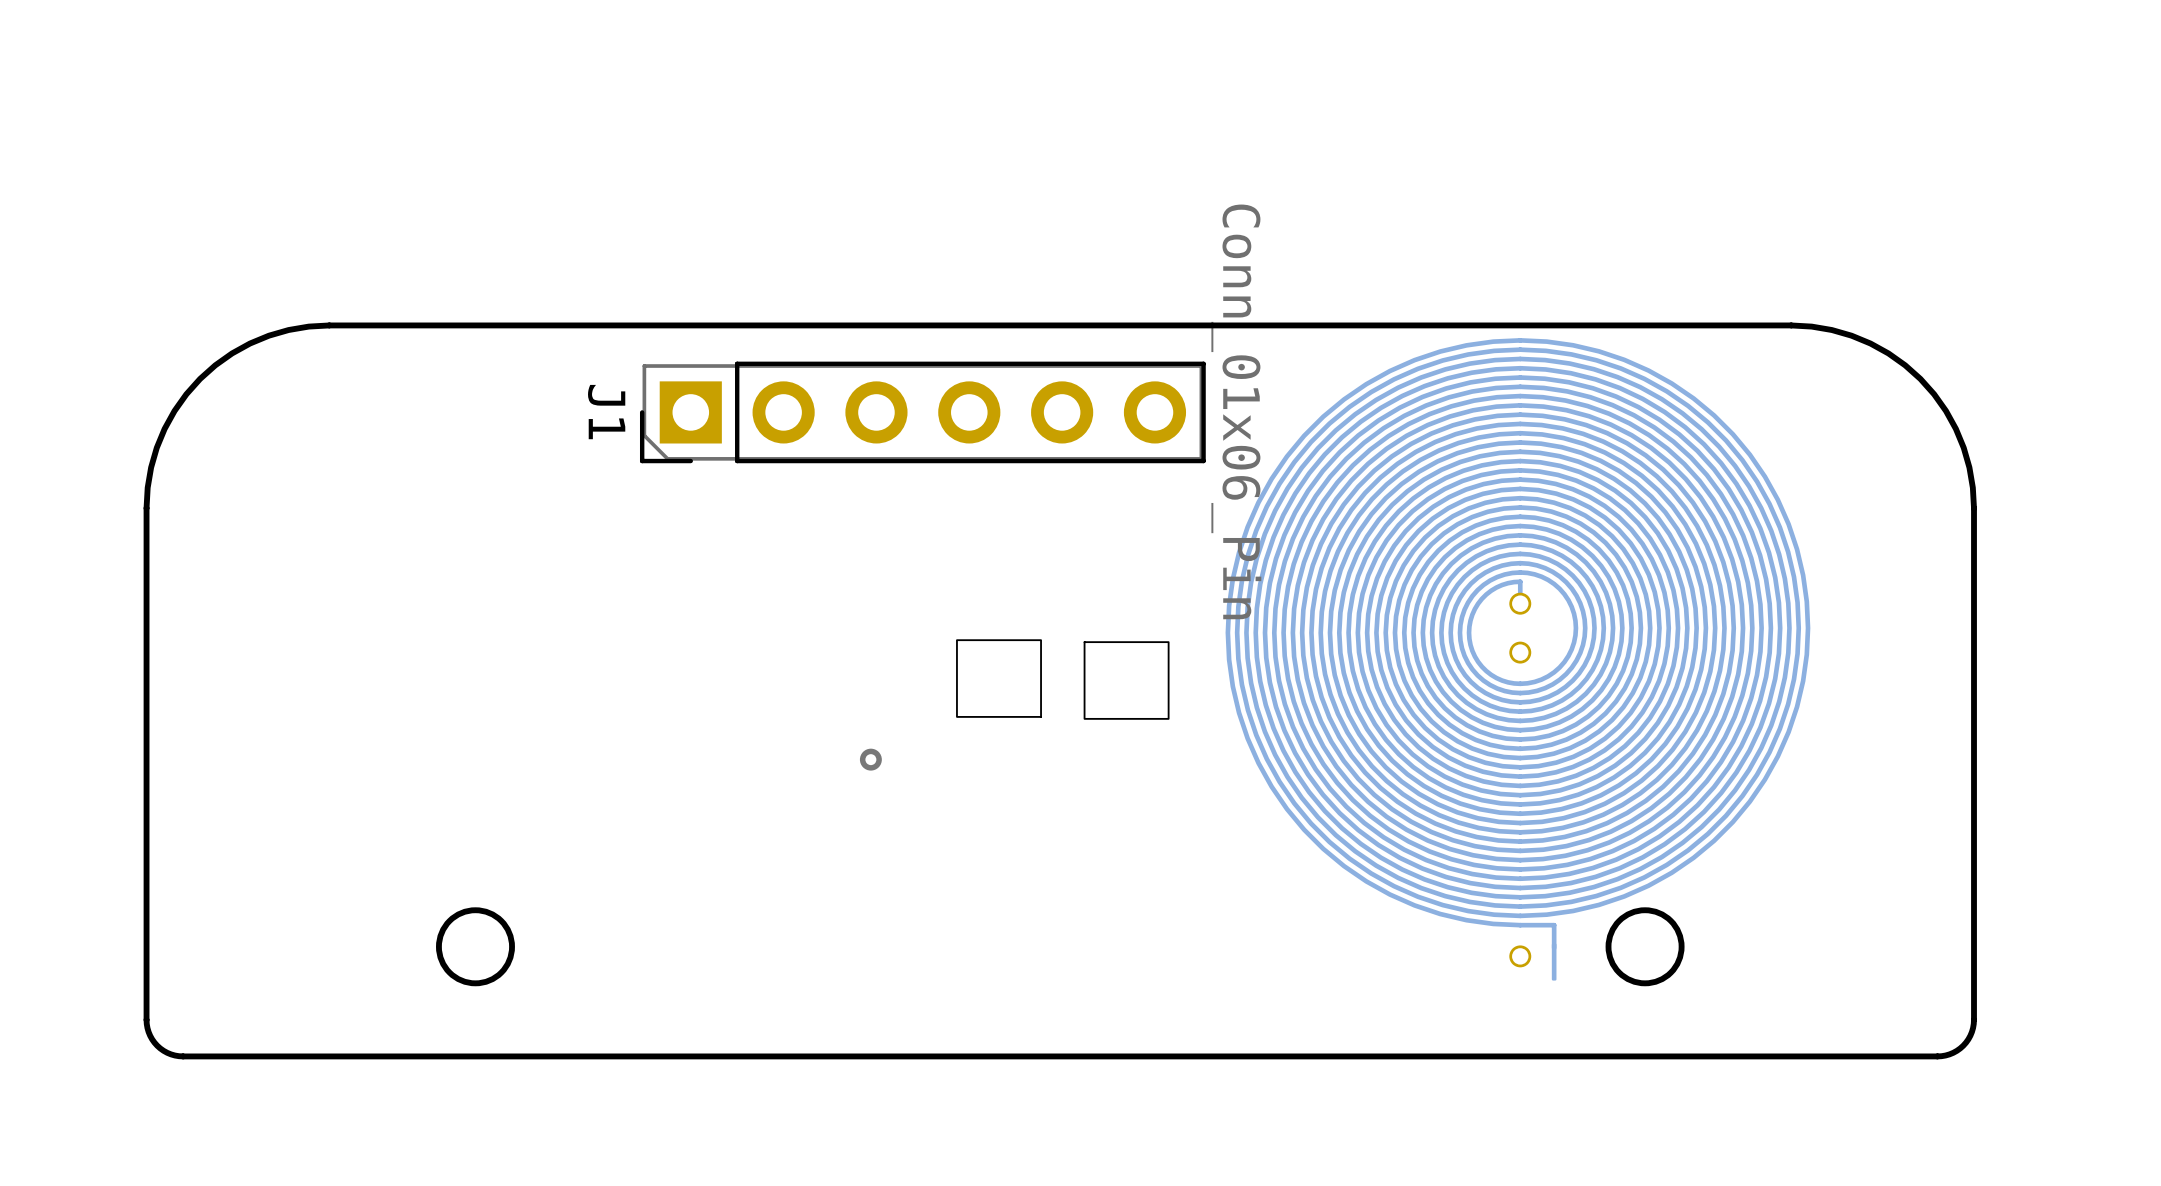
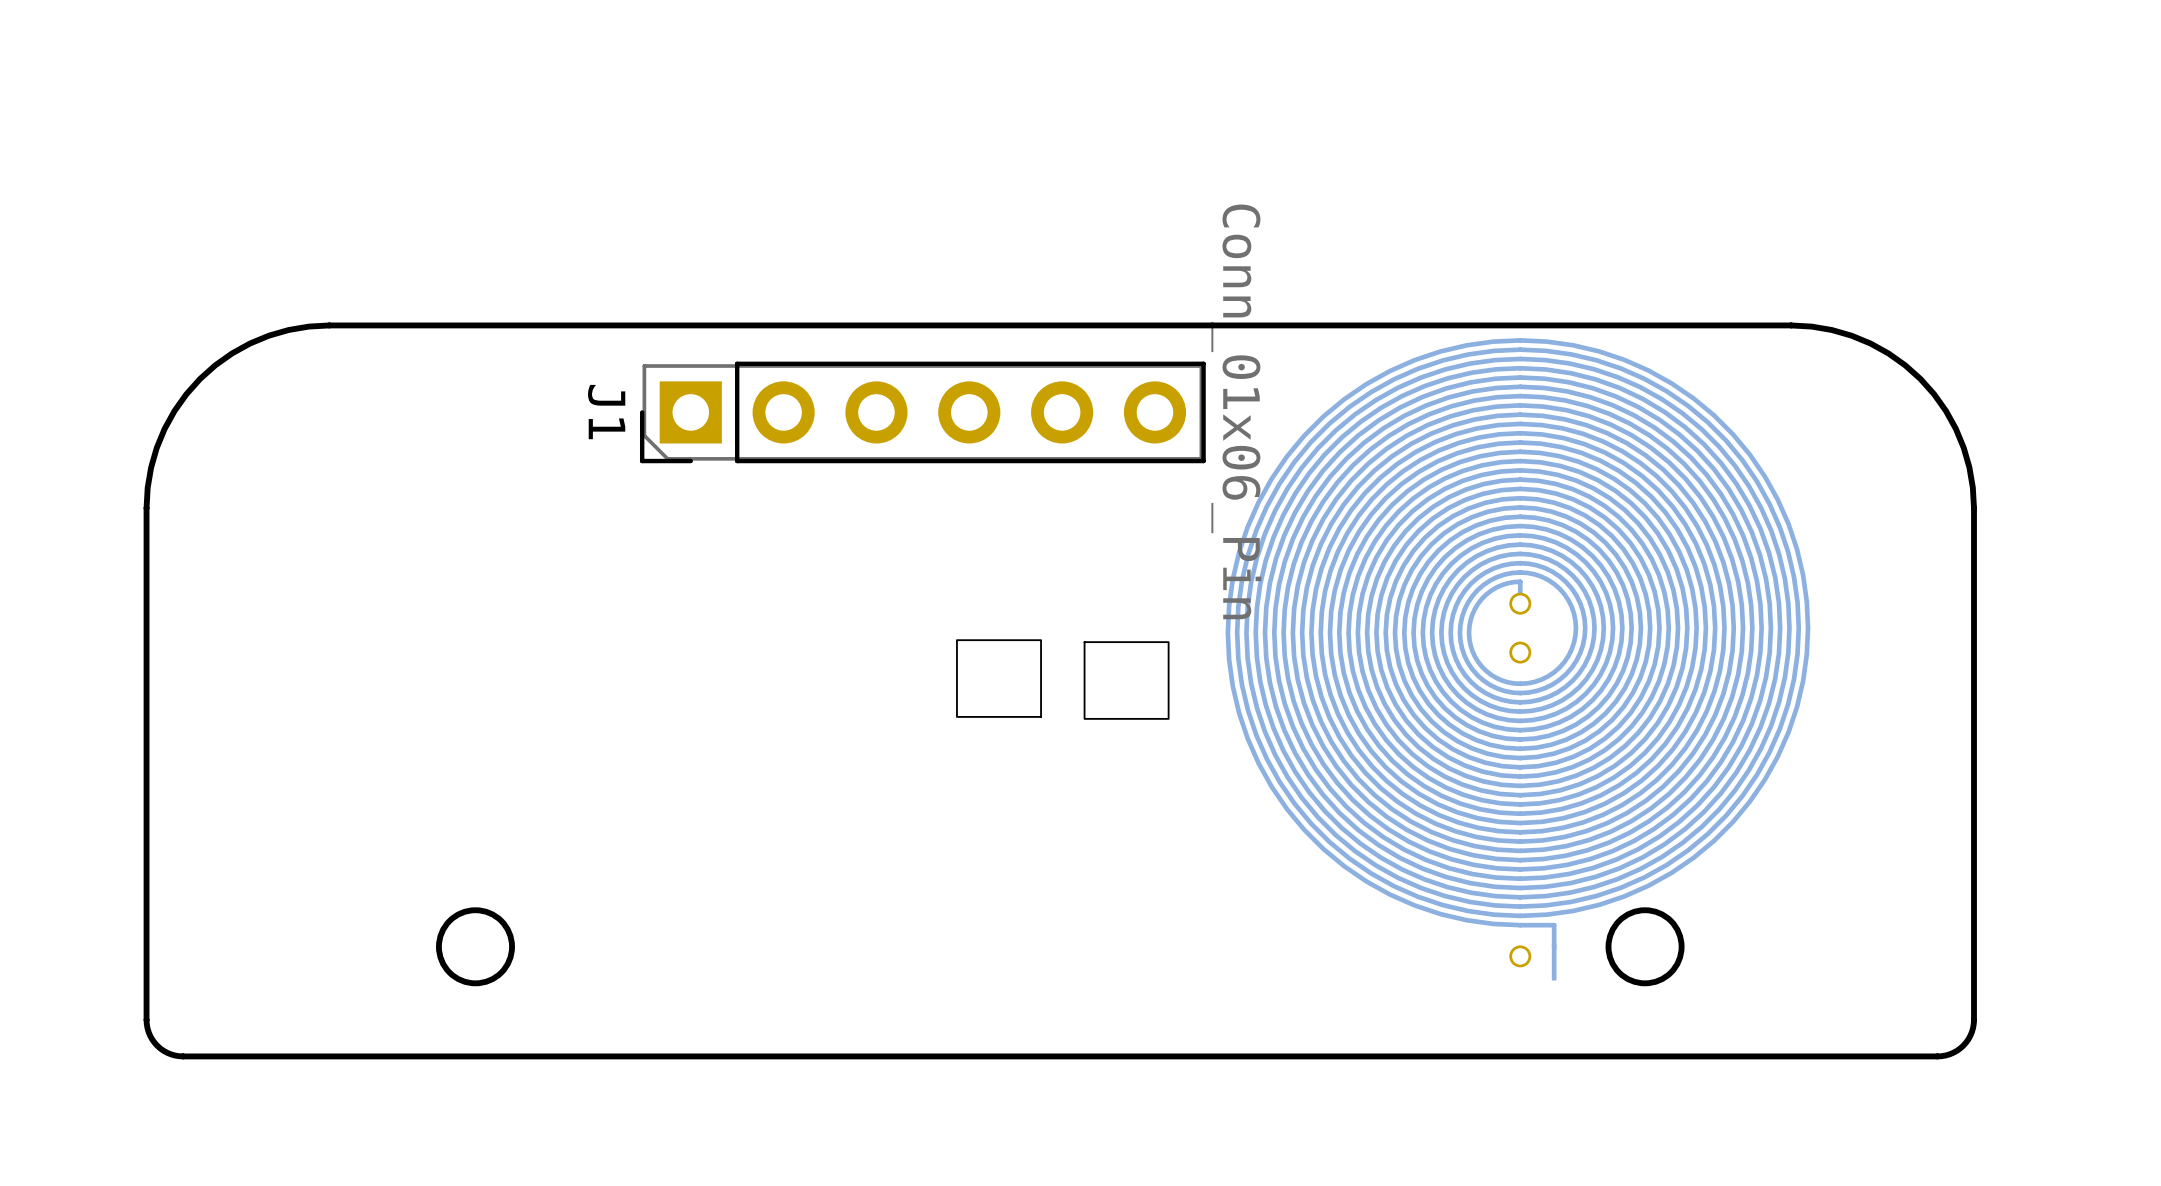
via: (870, 759) -> none

